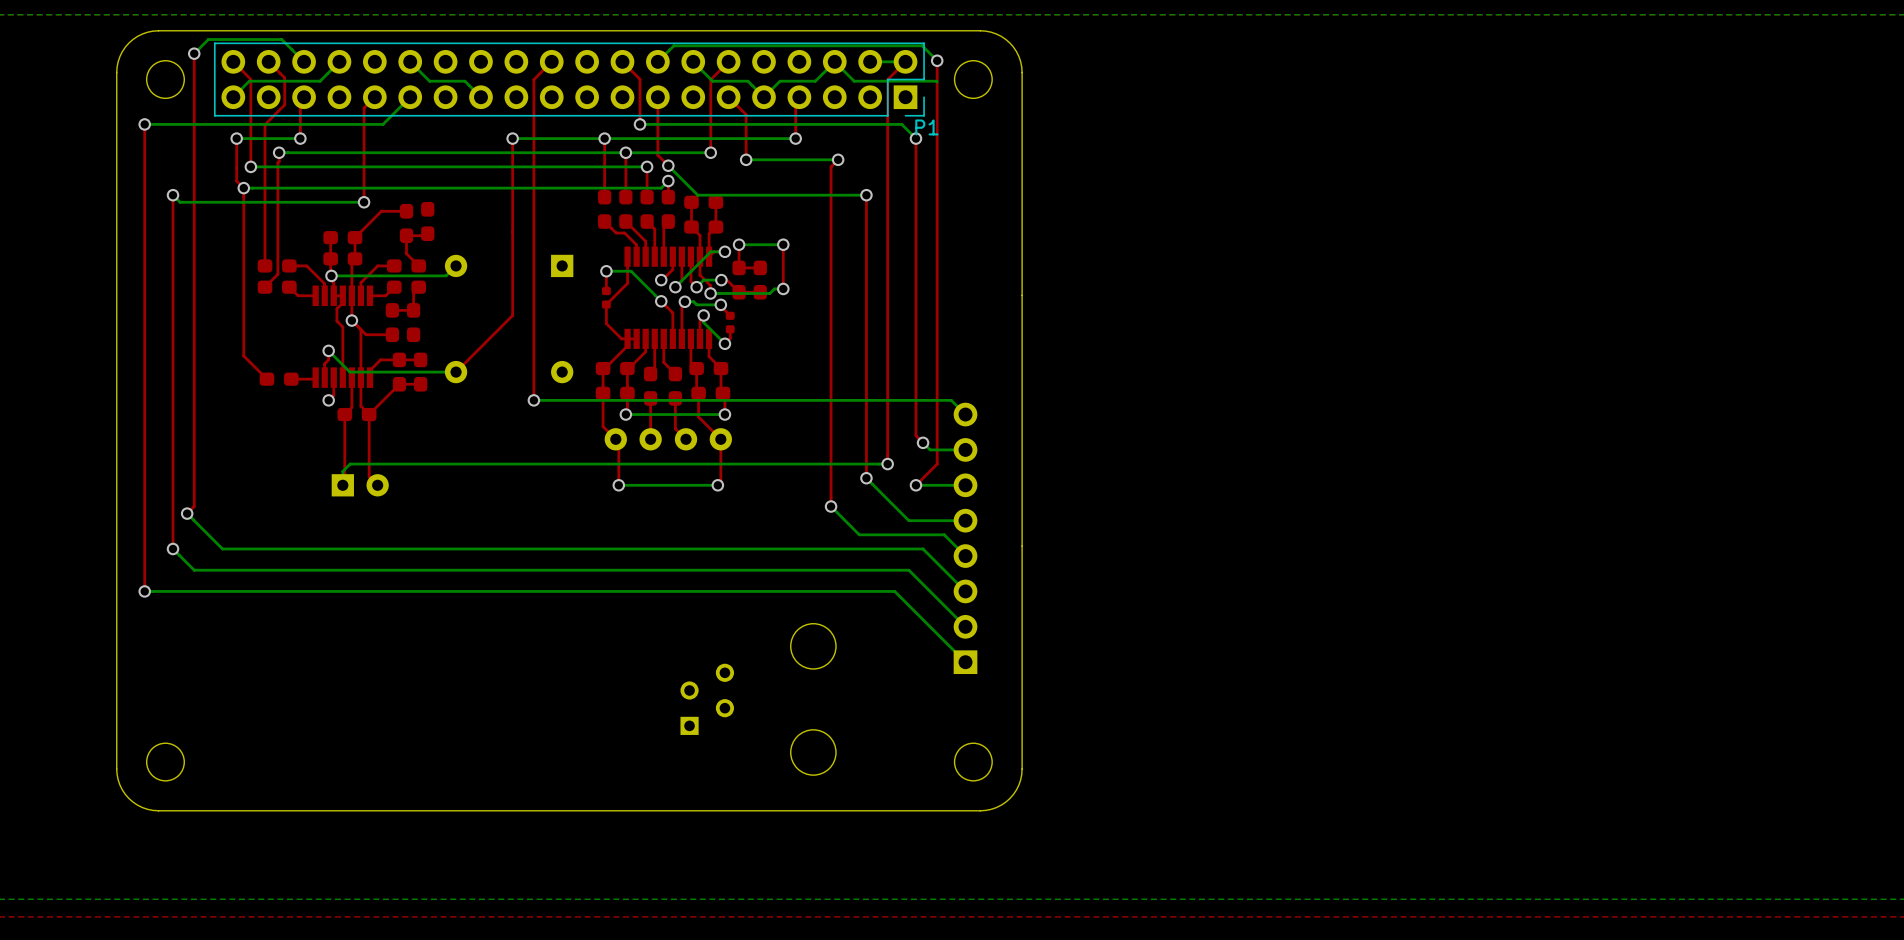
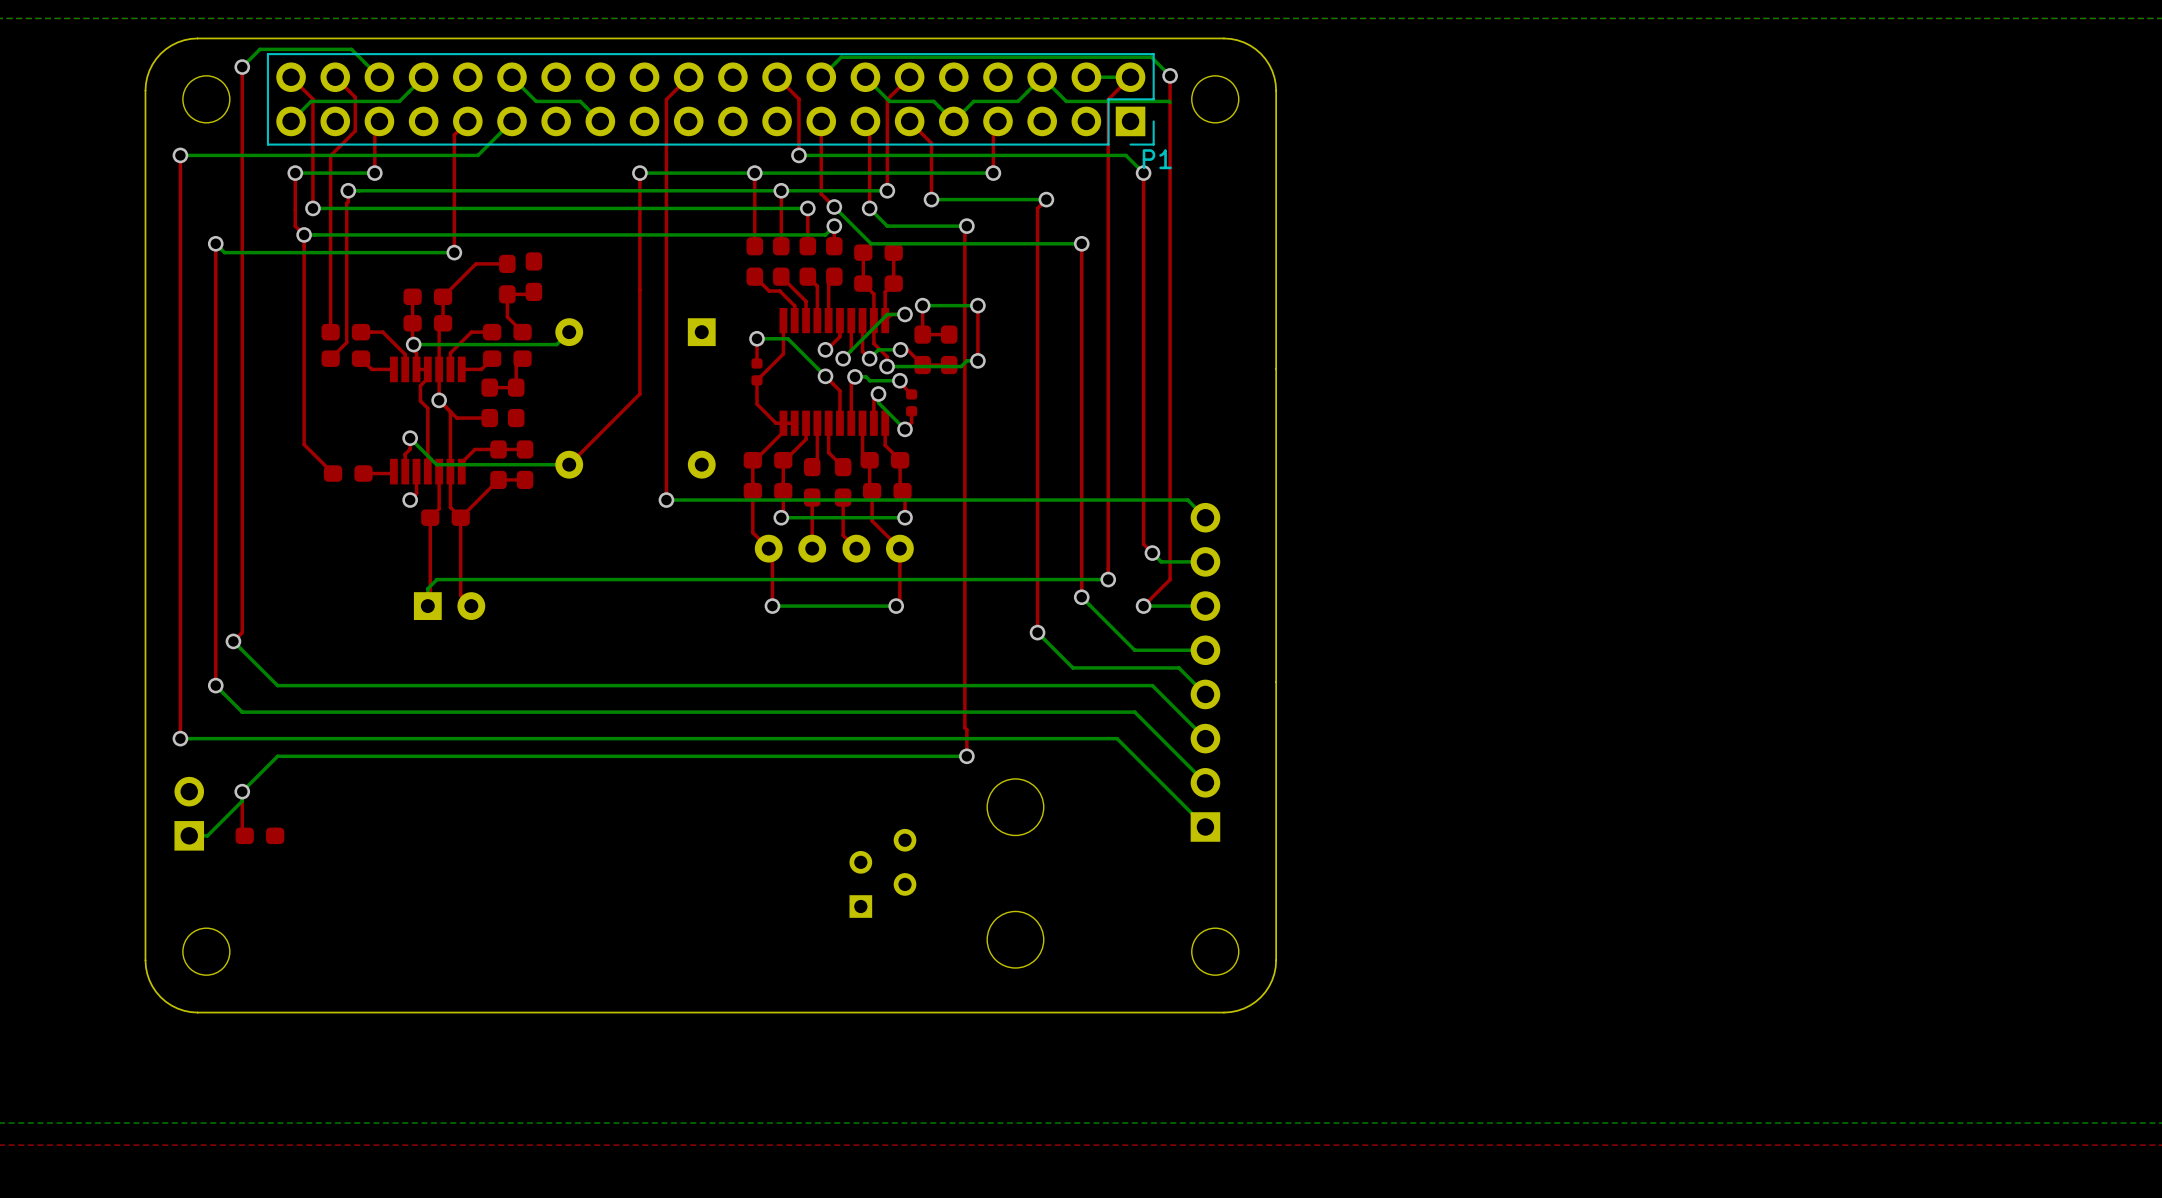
top track: none -> (865, 121) (869, 125) (869, 208)
bottom track: none -> (869, 208) (887, 226) (966, 226)
via: none -> (869, 208)
top track: none -> (966, 226) (964, 228) (964, 727) (966, 729) (966, 756)
via: none -> (966, 226)
bottom track: none -> (966, 756) (277, 756) (242, 791) (242, 801) (207, 835) (189, 835)
via: none -> (966, 756)
top track: none -> (242, 791) (242, 833) (244, 835)
via: none -> (242, 791)
part: none -> (189, 813)
part: none -> (259, 835)

